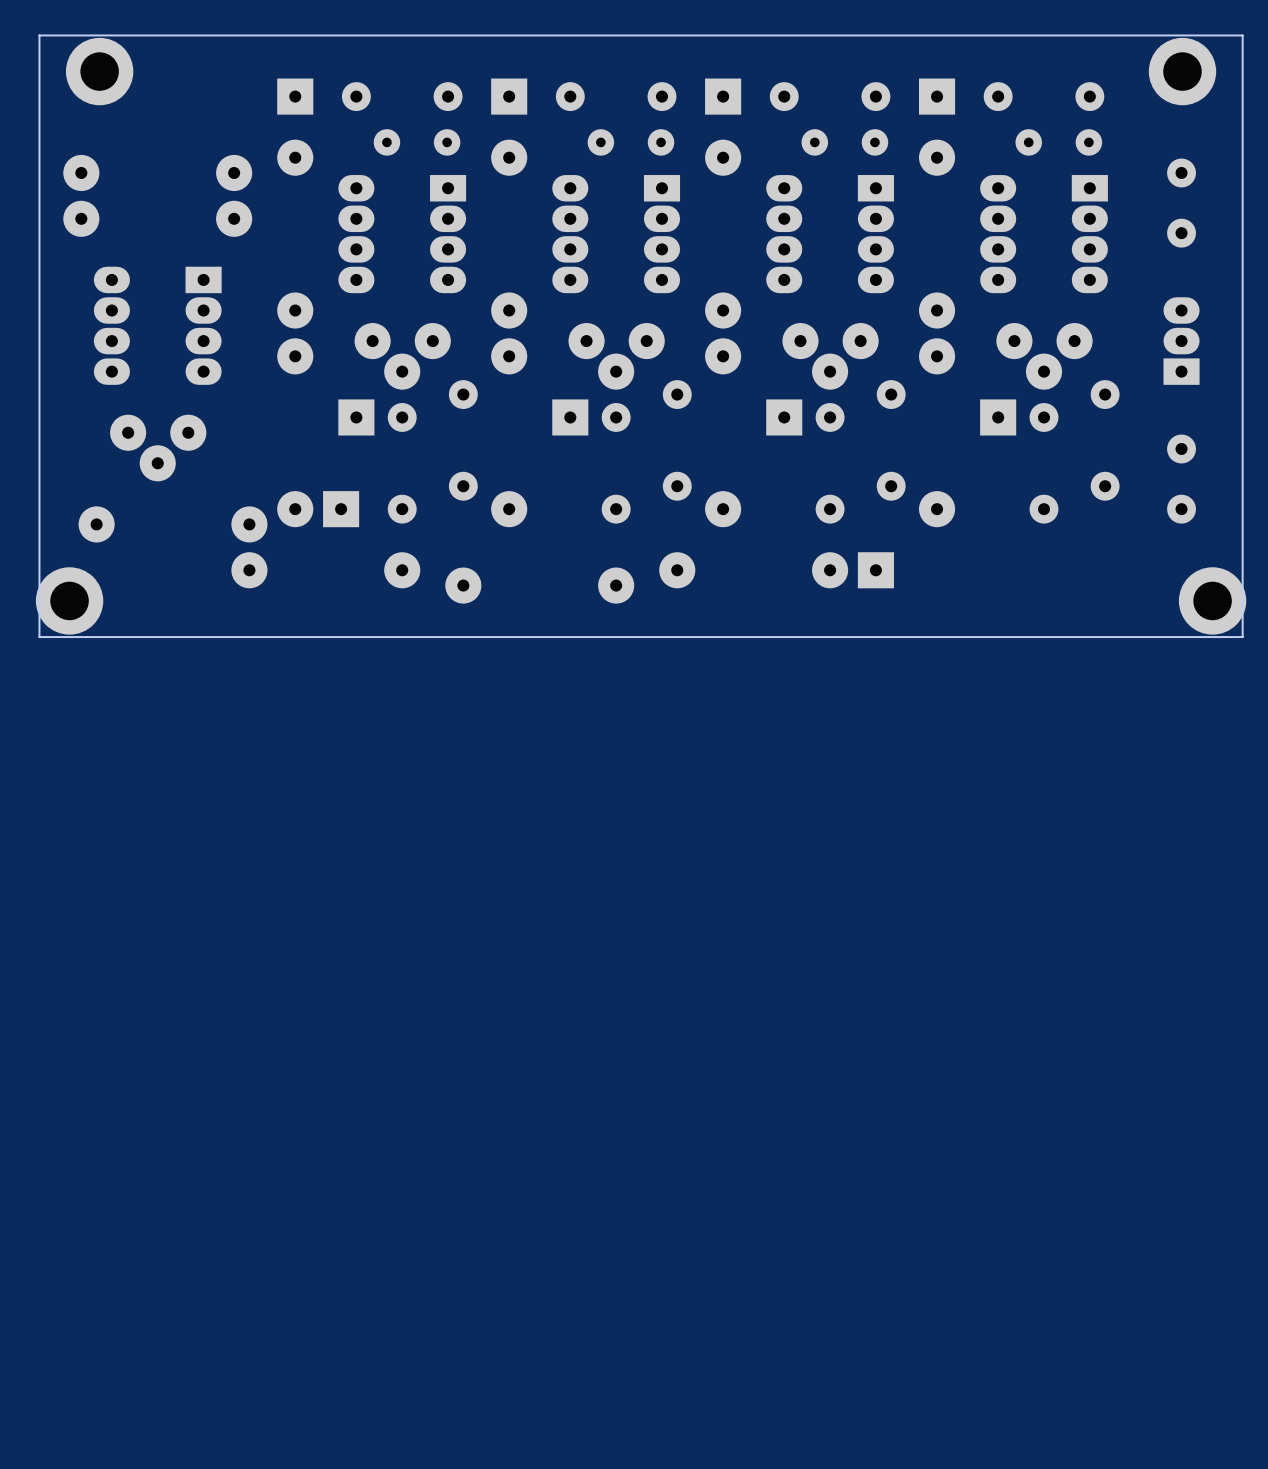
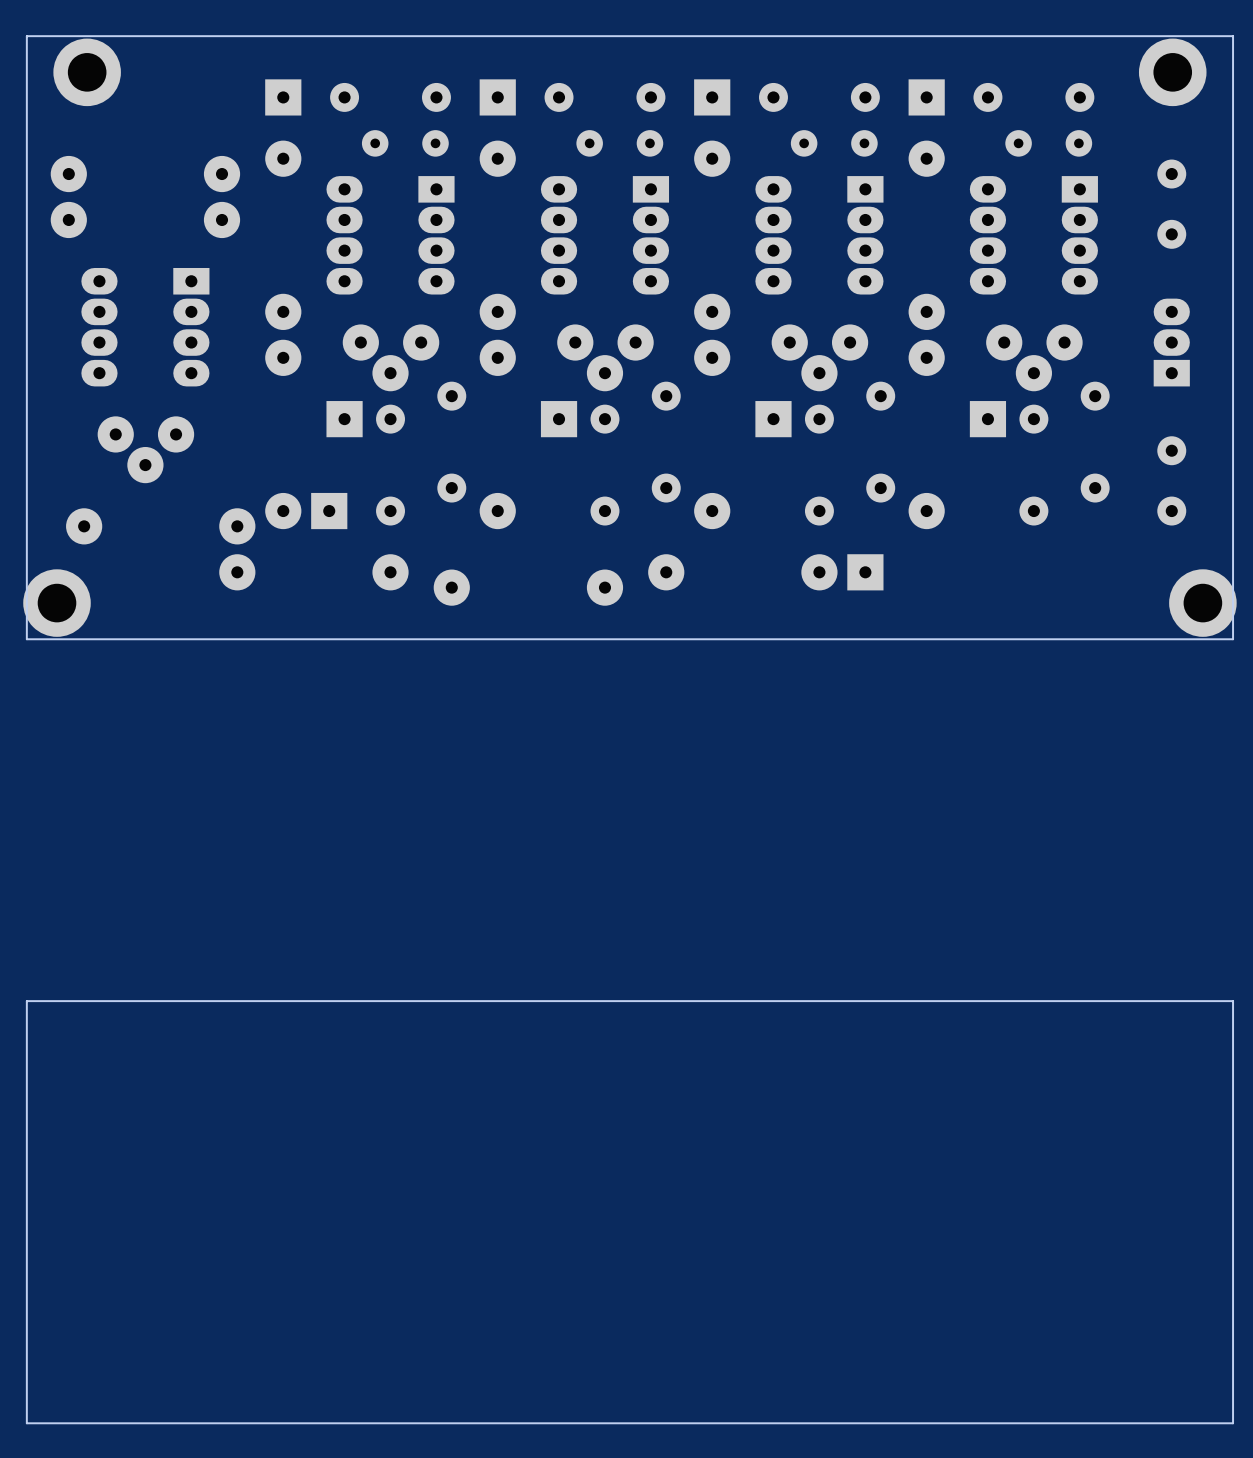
board edge: none -> (1233, 1001) (1233, 1423) (26, 1423) (26, 1001) (1233, 1001)

